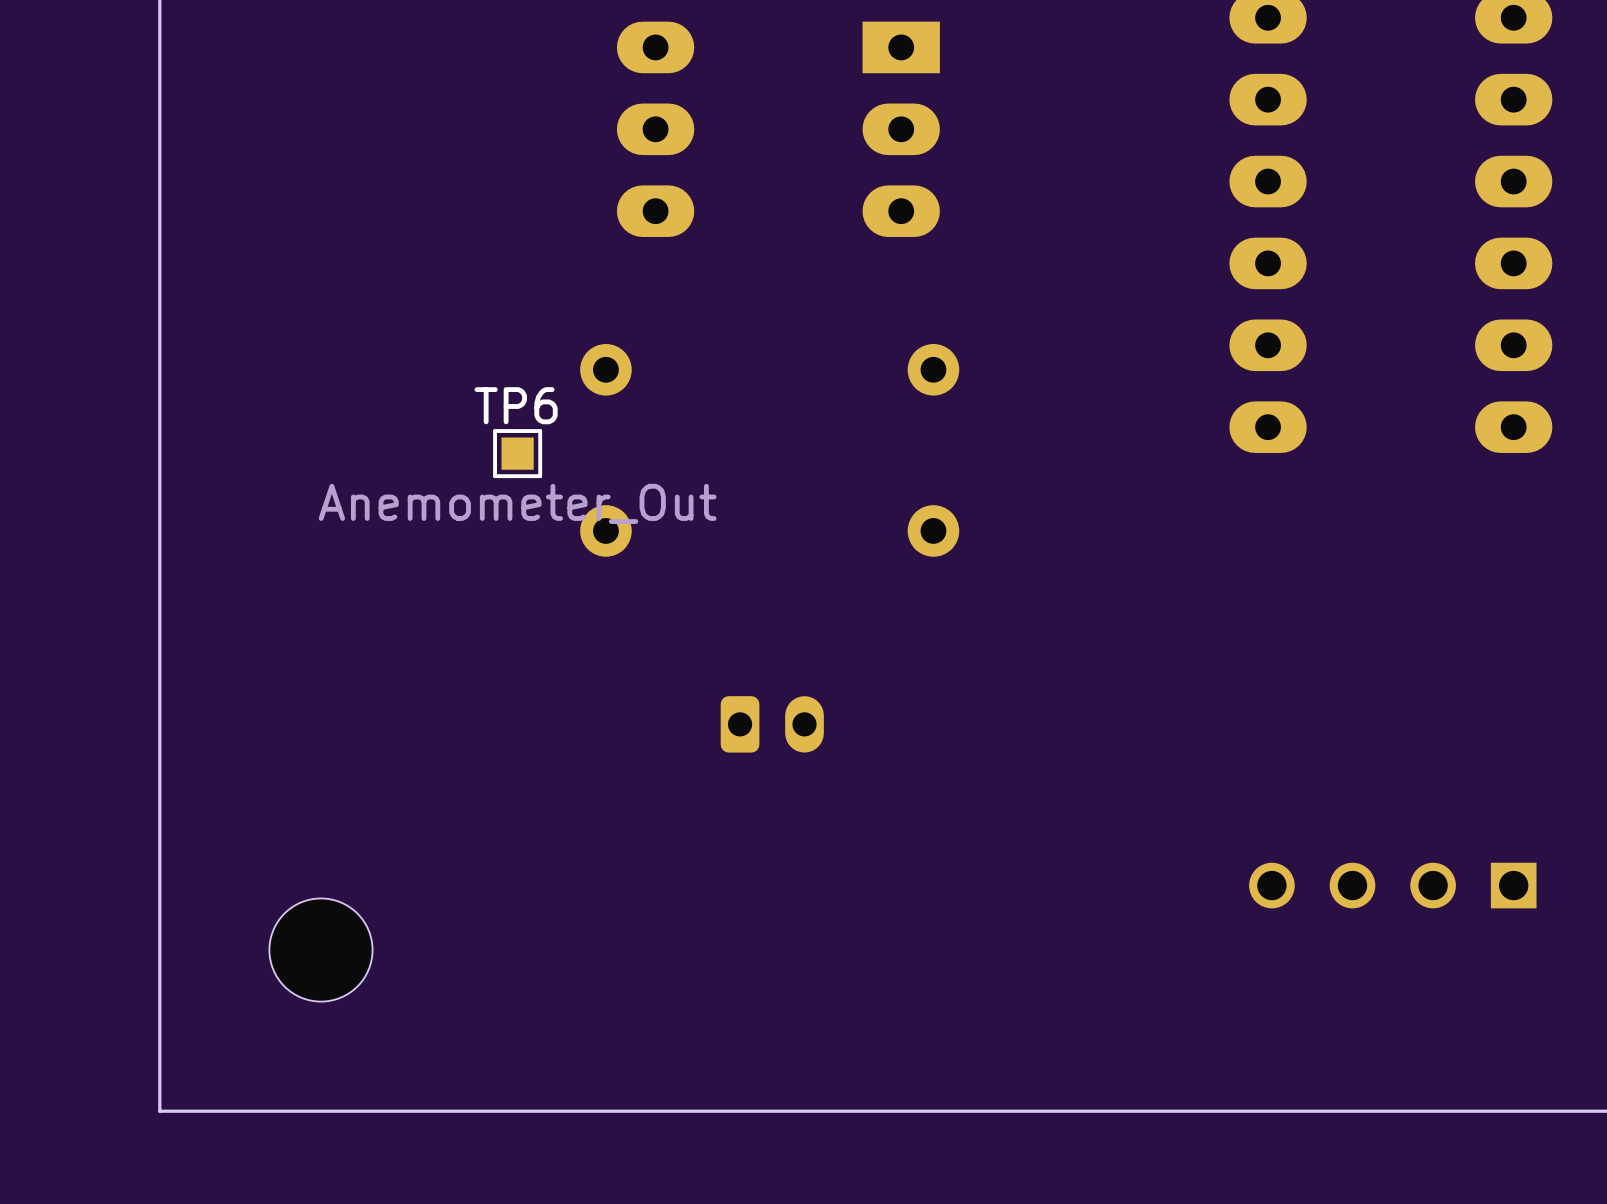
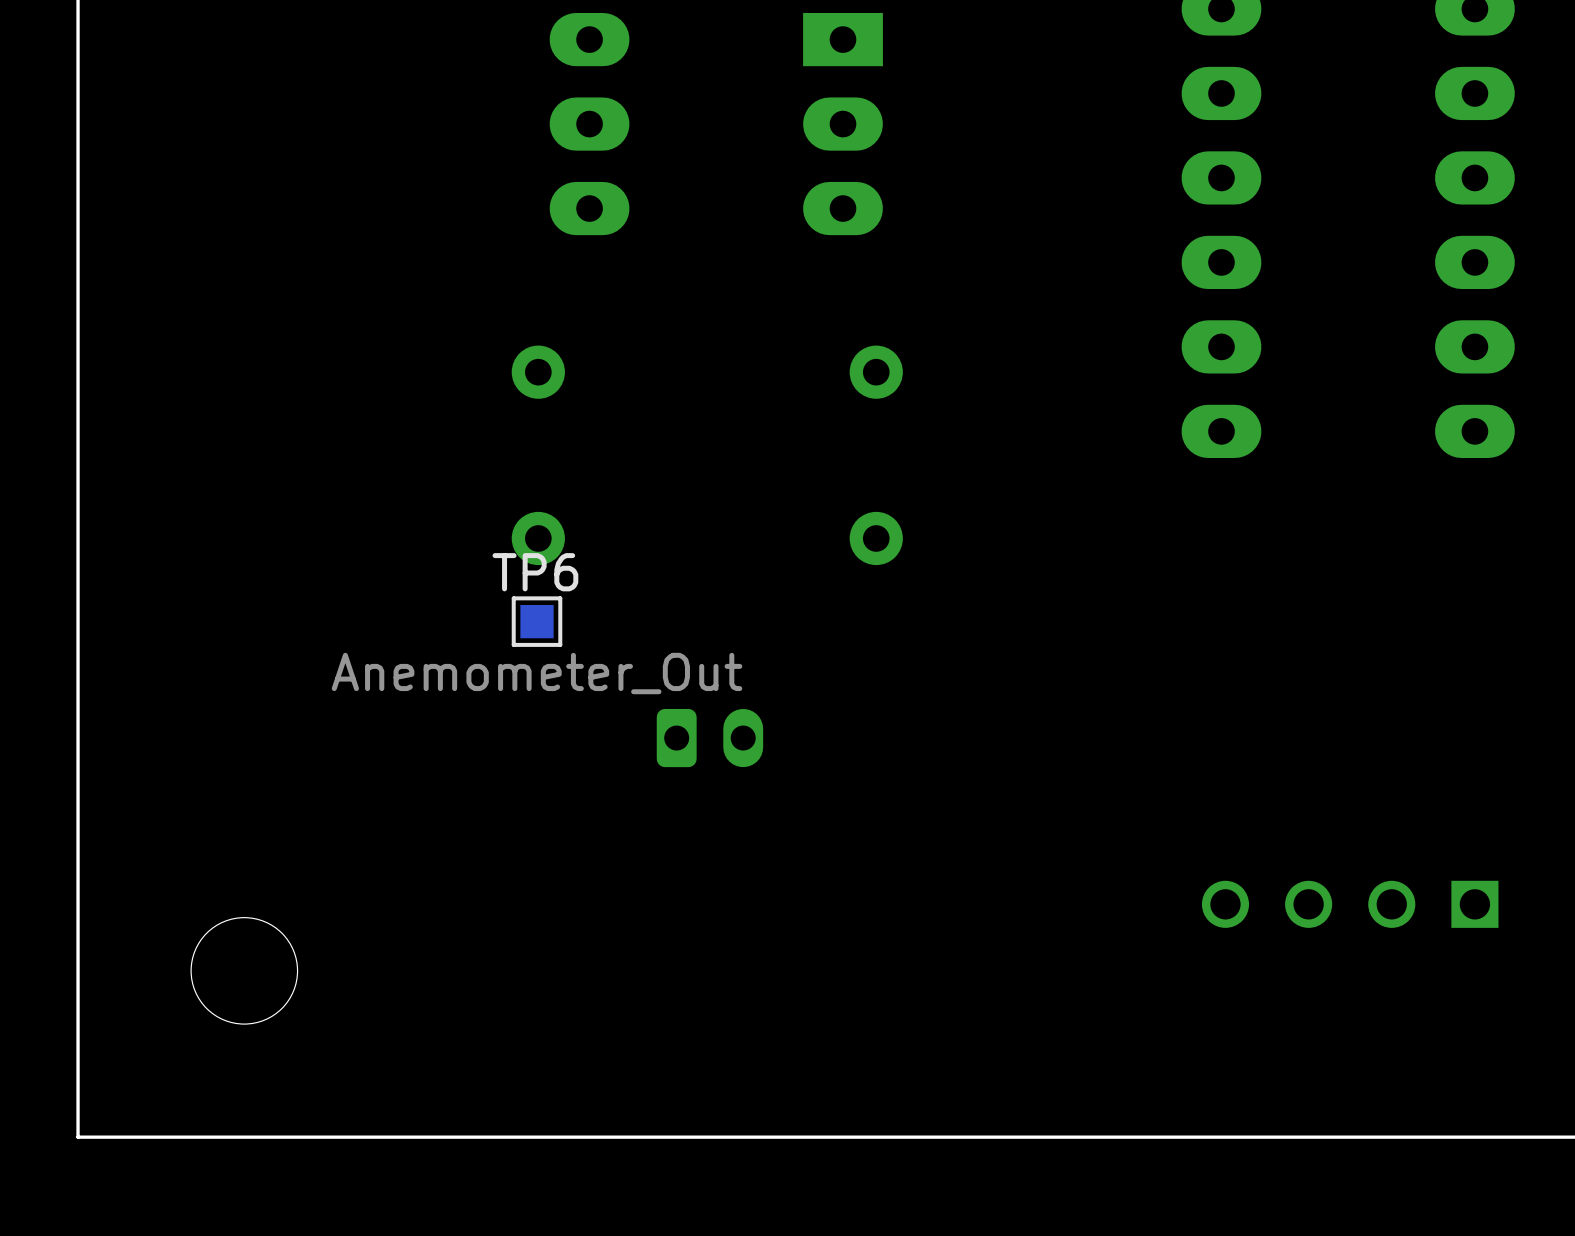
TP6 position: (517, 453) -> (537, 621)

